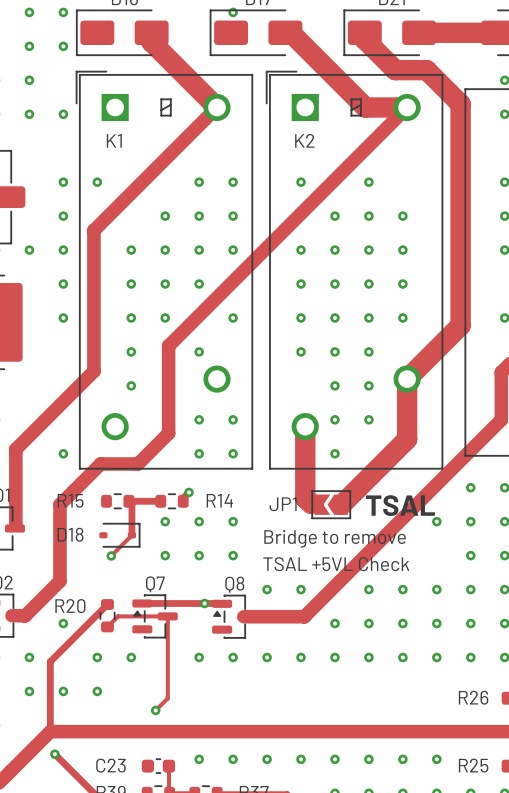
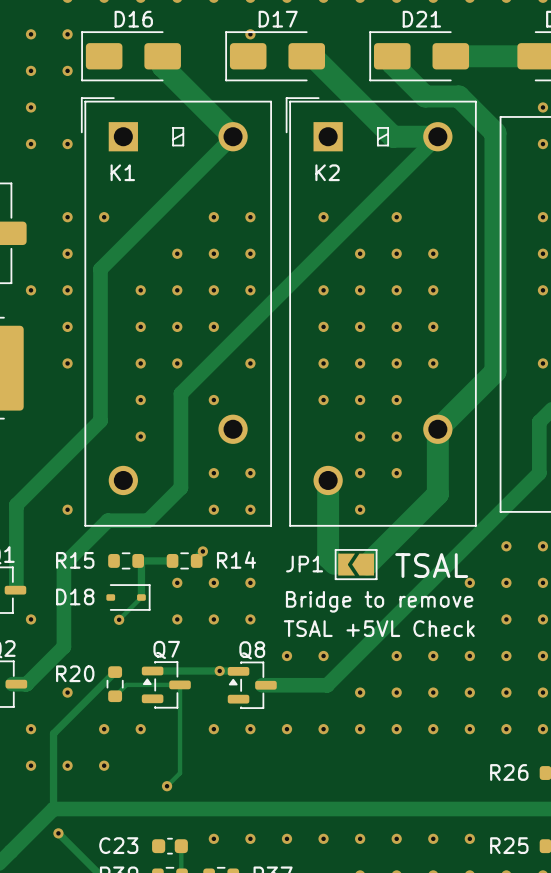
via: none -> (31, 619)

